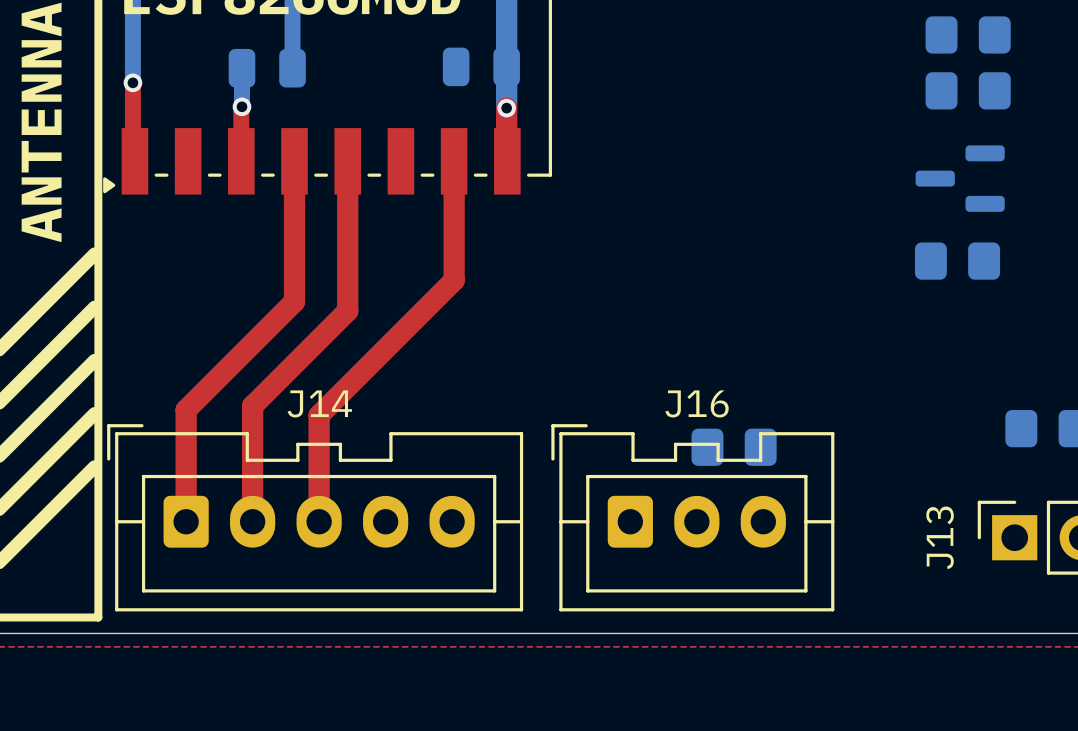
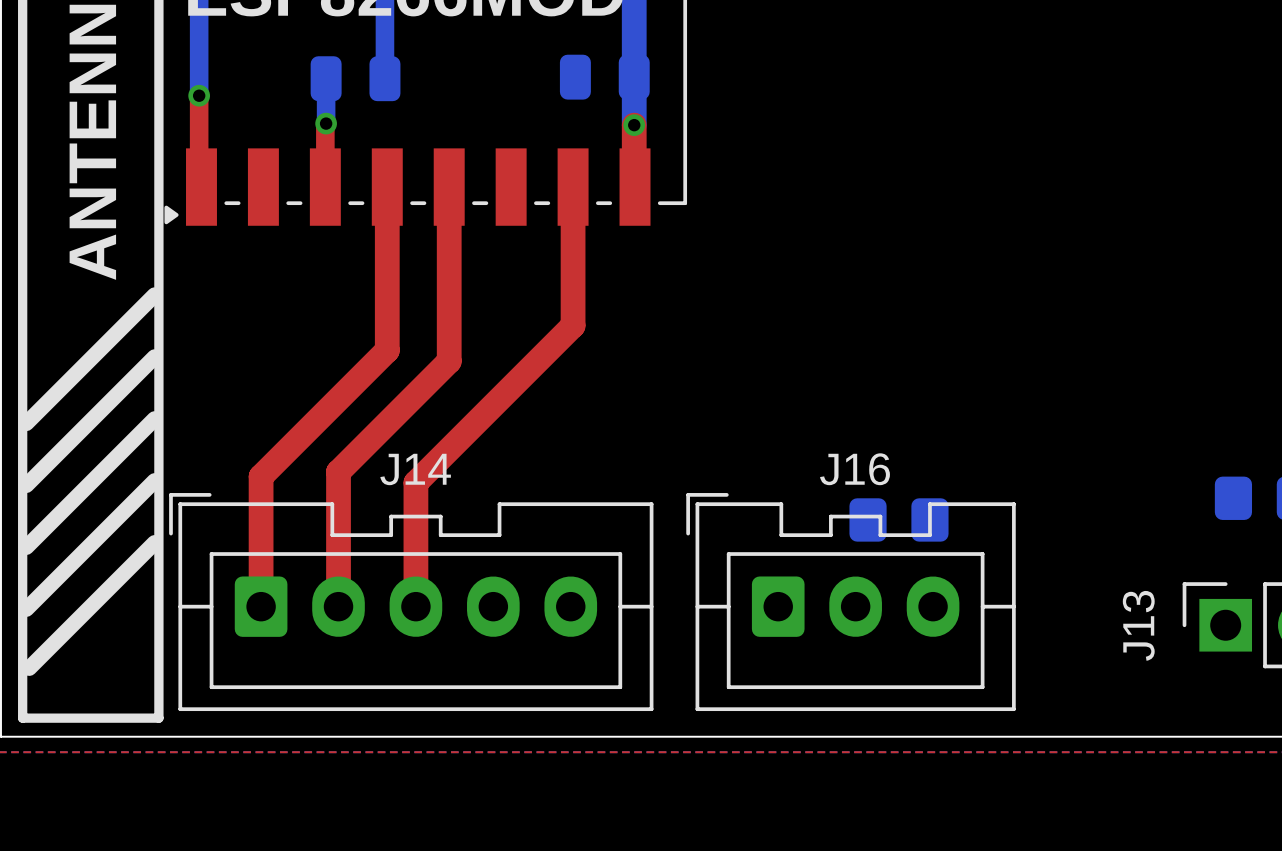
part: (968, 34) -> none
part: (968, 90) -> none
part: (960, 178) -> none
part: (957, 261) -> none

